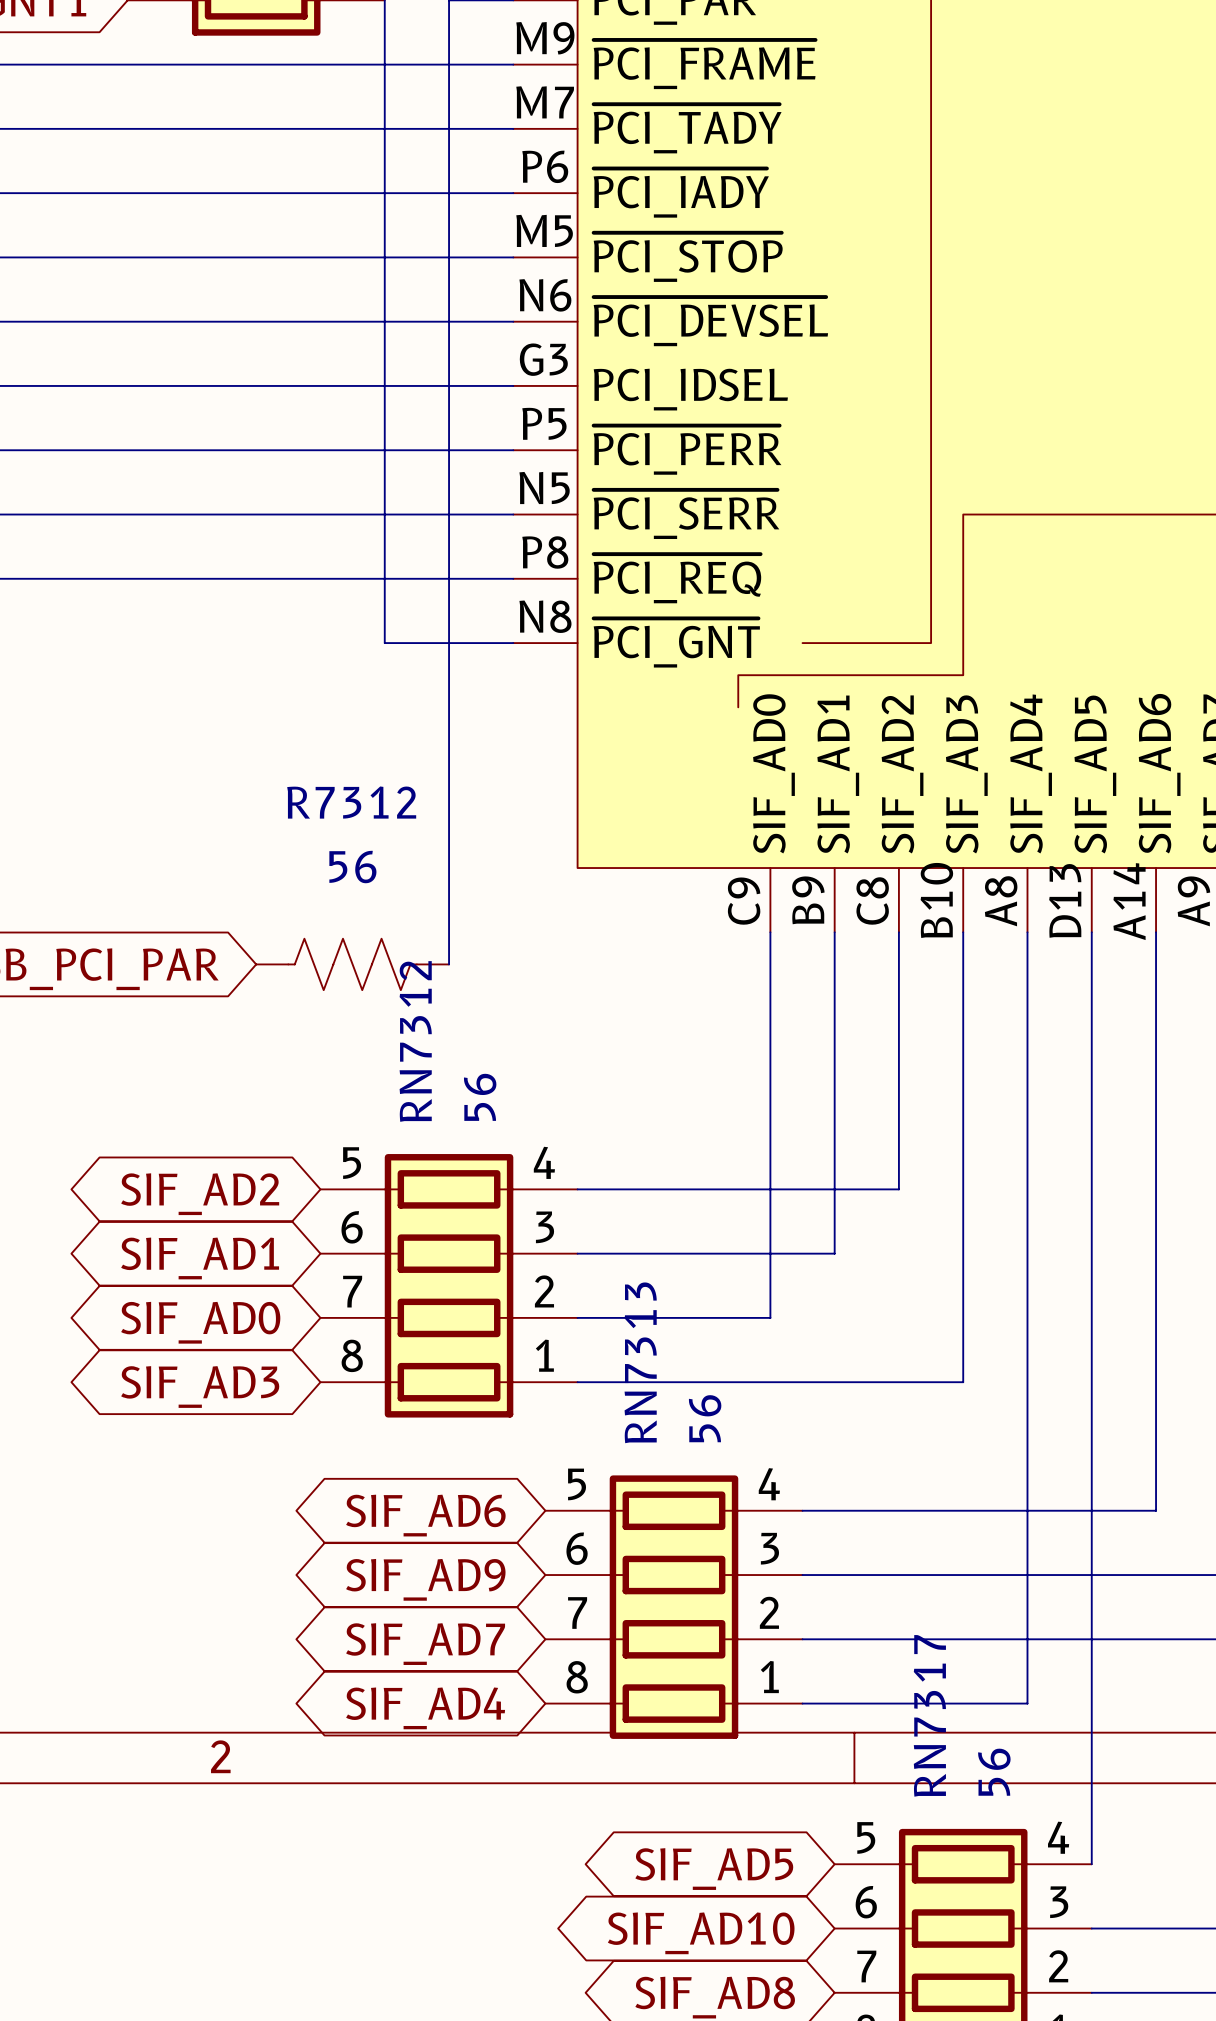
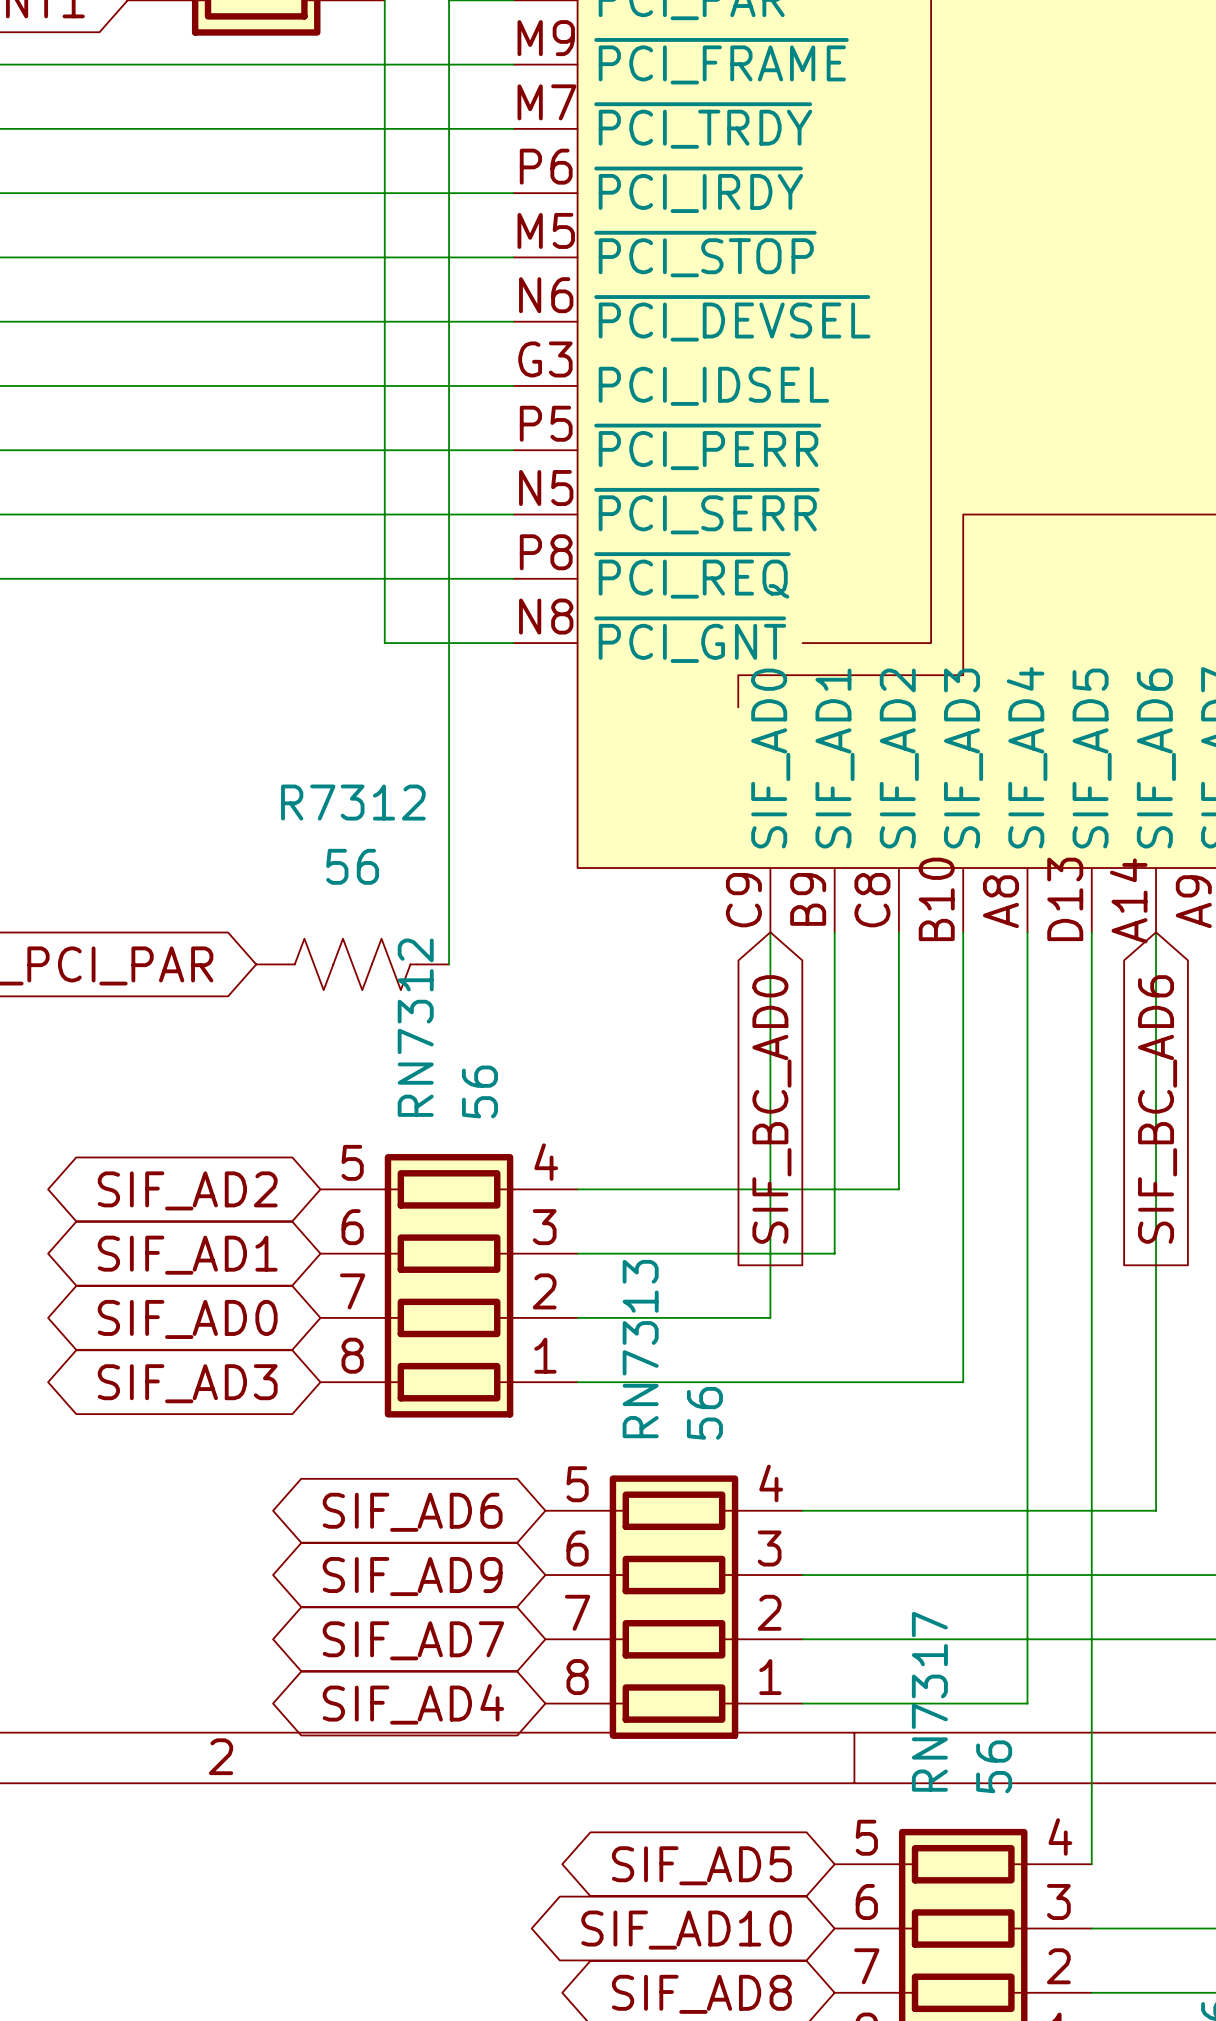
part pin name: ~{PCI_TADY} (687, 128) -> ~{PCI_TRDY} (703, 125)
part pin name: ~{PCI_IADY} (681, 193) -> ~{PCI_IRDY} (698, 189)
global label: none -> SIF_BC_AD6 (1157, 1109)
global label: none -> SIF_BC_AD0 (771, 1109)

